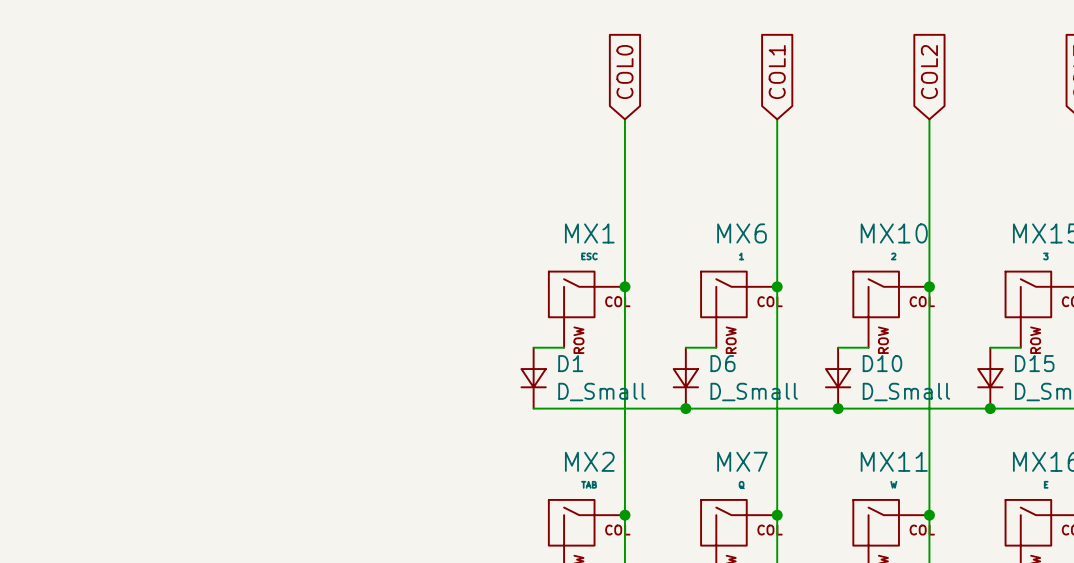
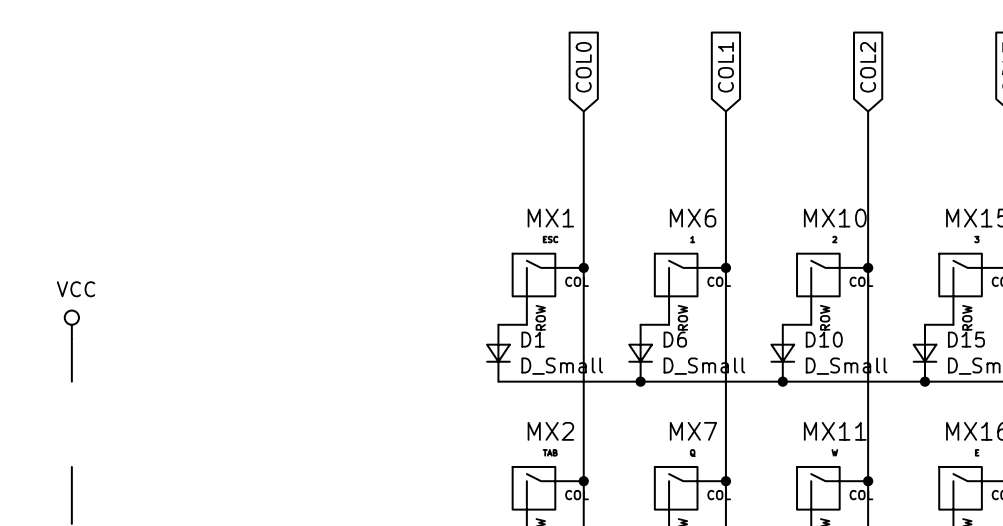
power symbol: none -> VCC (71, 324)
wire: none -> (71, 338) (71, 381)
wire: none -> (71, 466) (71, 523)

